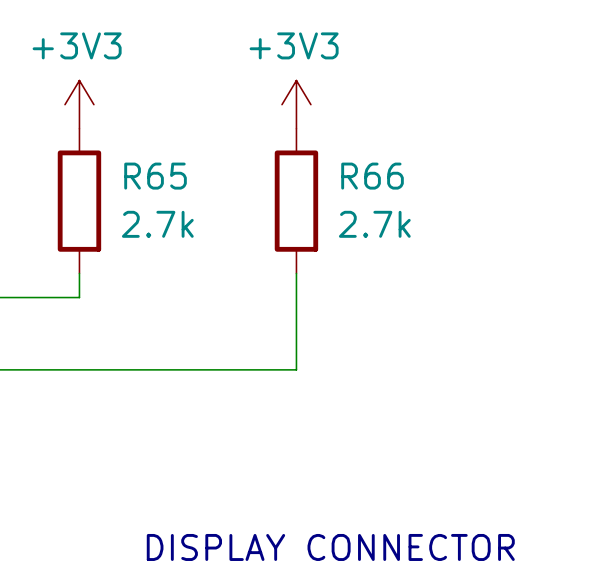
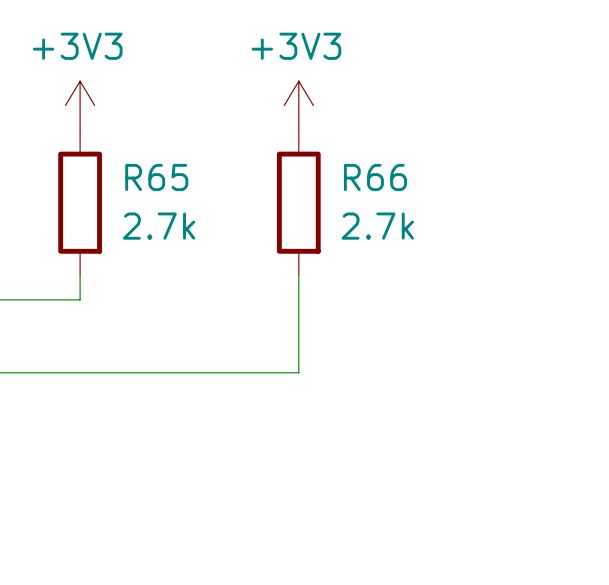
text: DISPLAY CONNECTOR (330, 547) -> none

